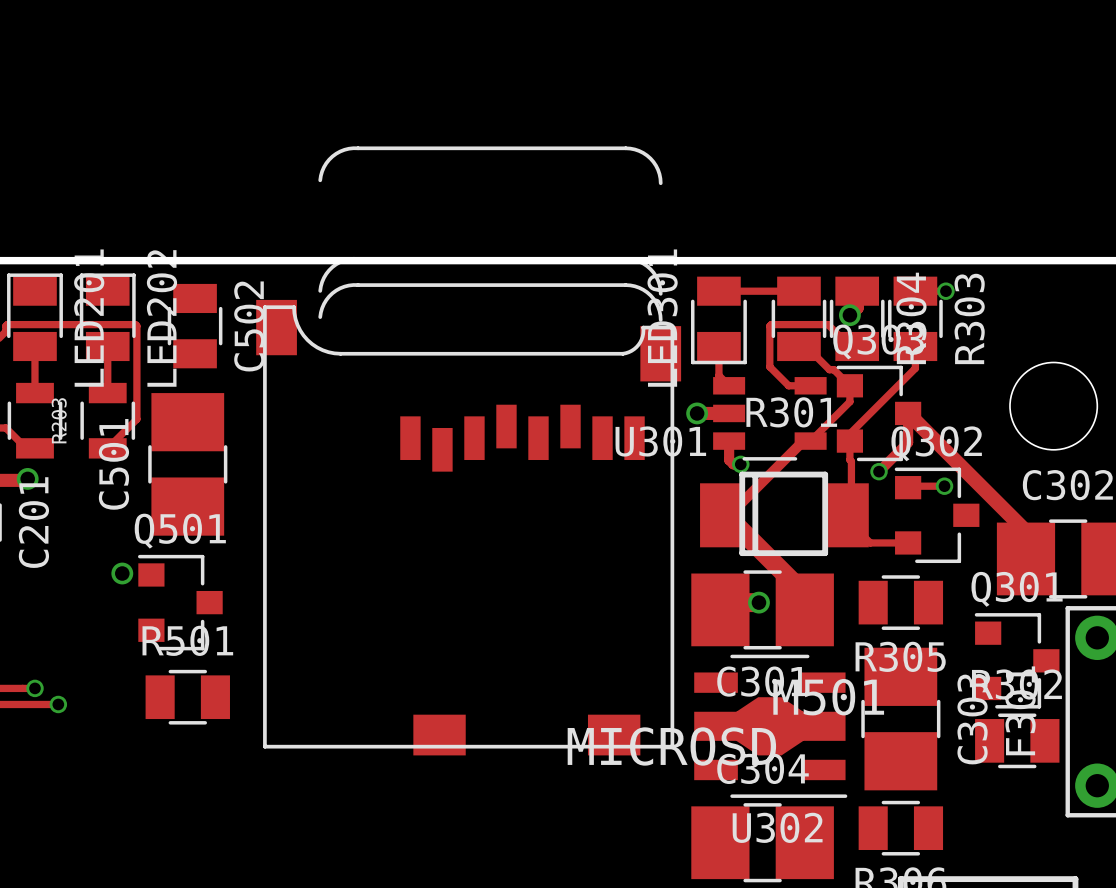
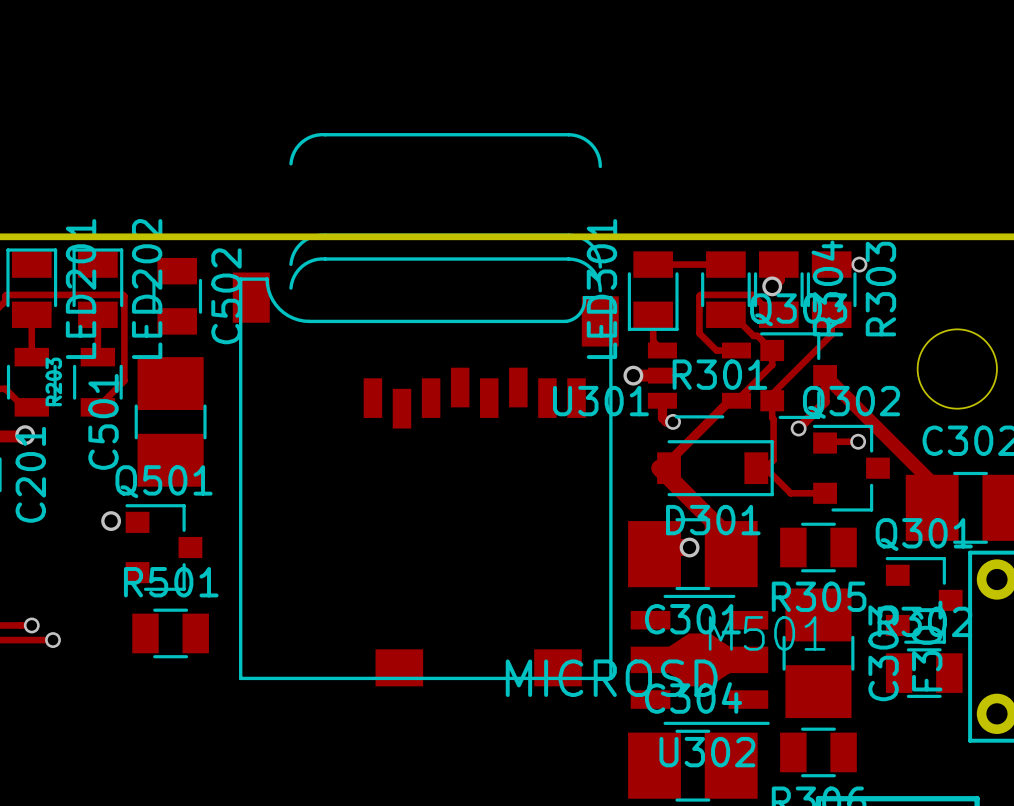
part: (784, 513) -> none
D301: none -> (715, 468)

